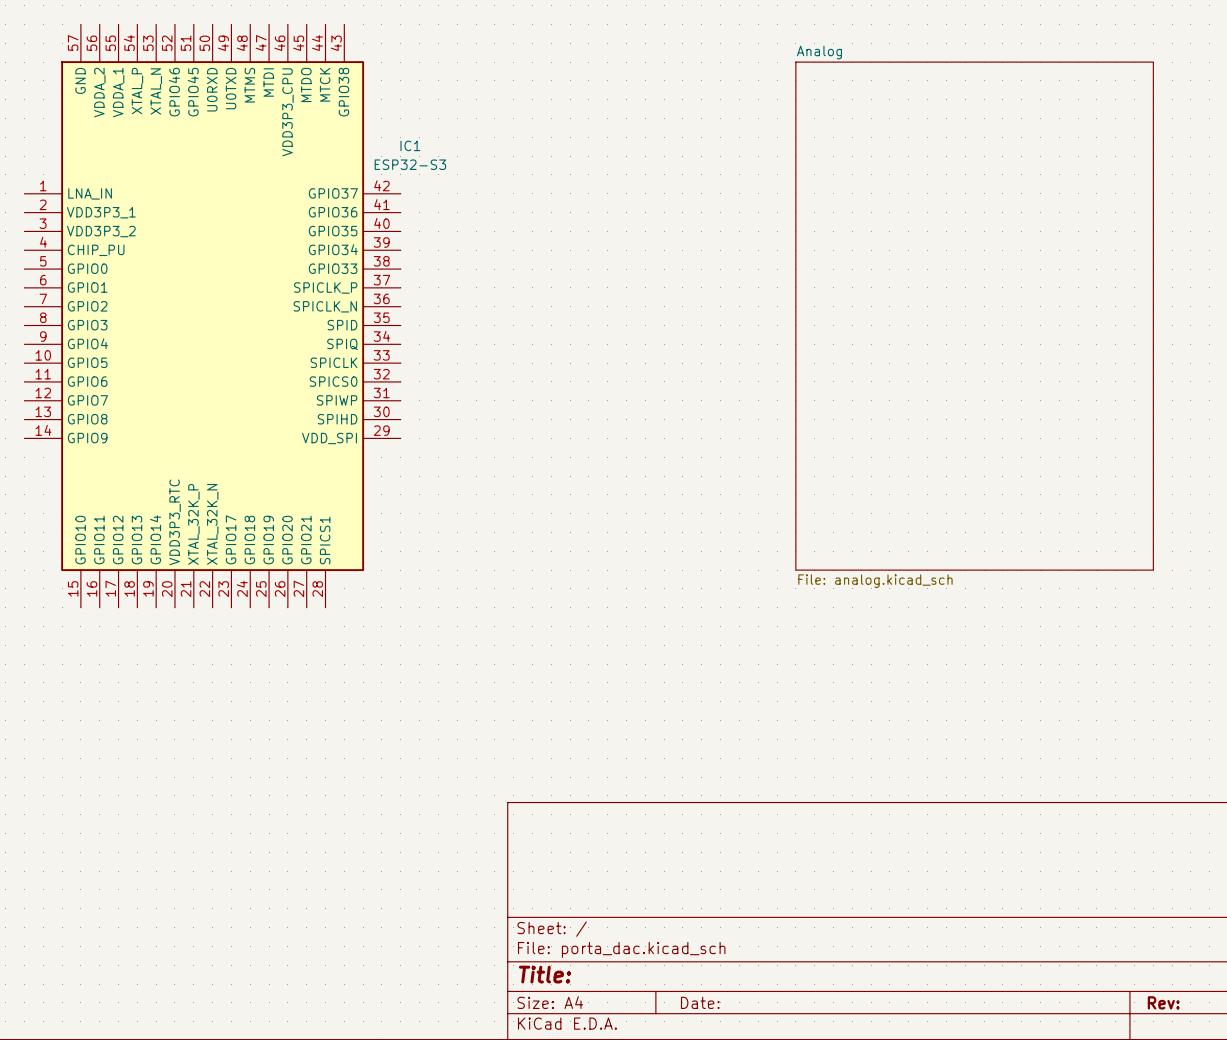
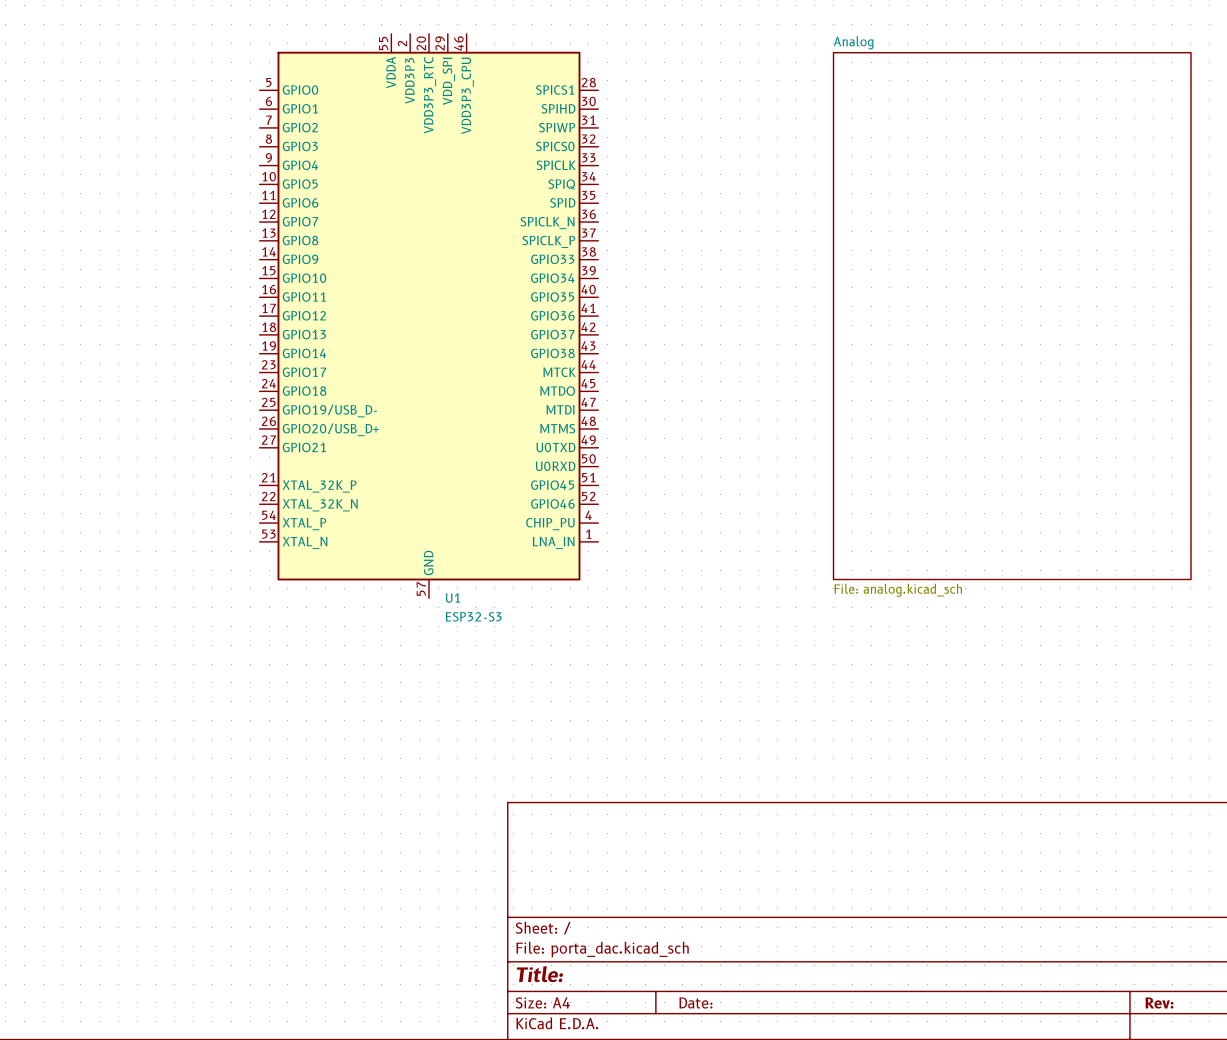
IC1: ESP32-S3 (212, 316) -> none
U1: none -> ESP32-S3 (428, 316)
sheet Analog: File: analog.kicad_sch (974, 316) -> none
sheet Analog: none -> File: analog.kicad_sch (1012, 316)

